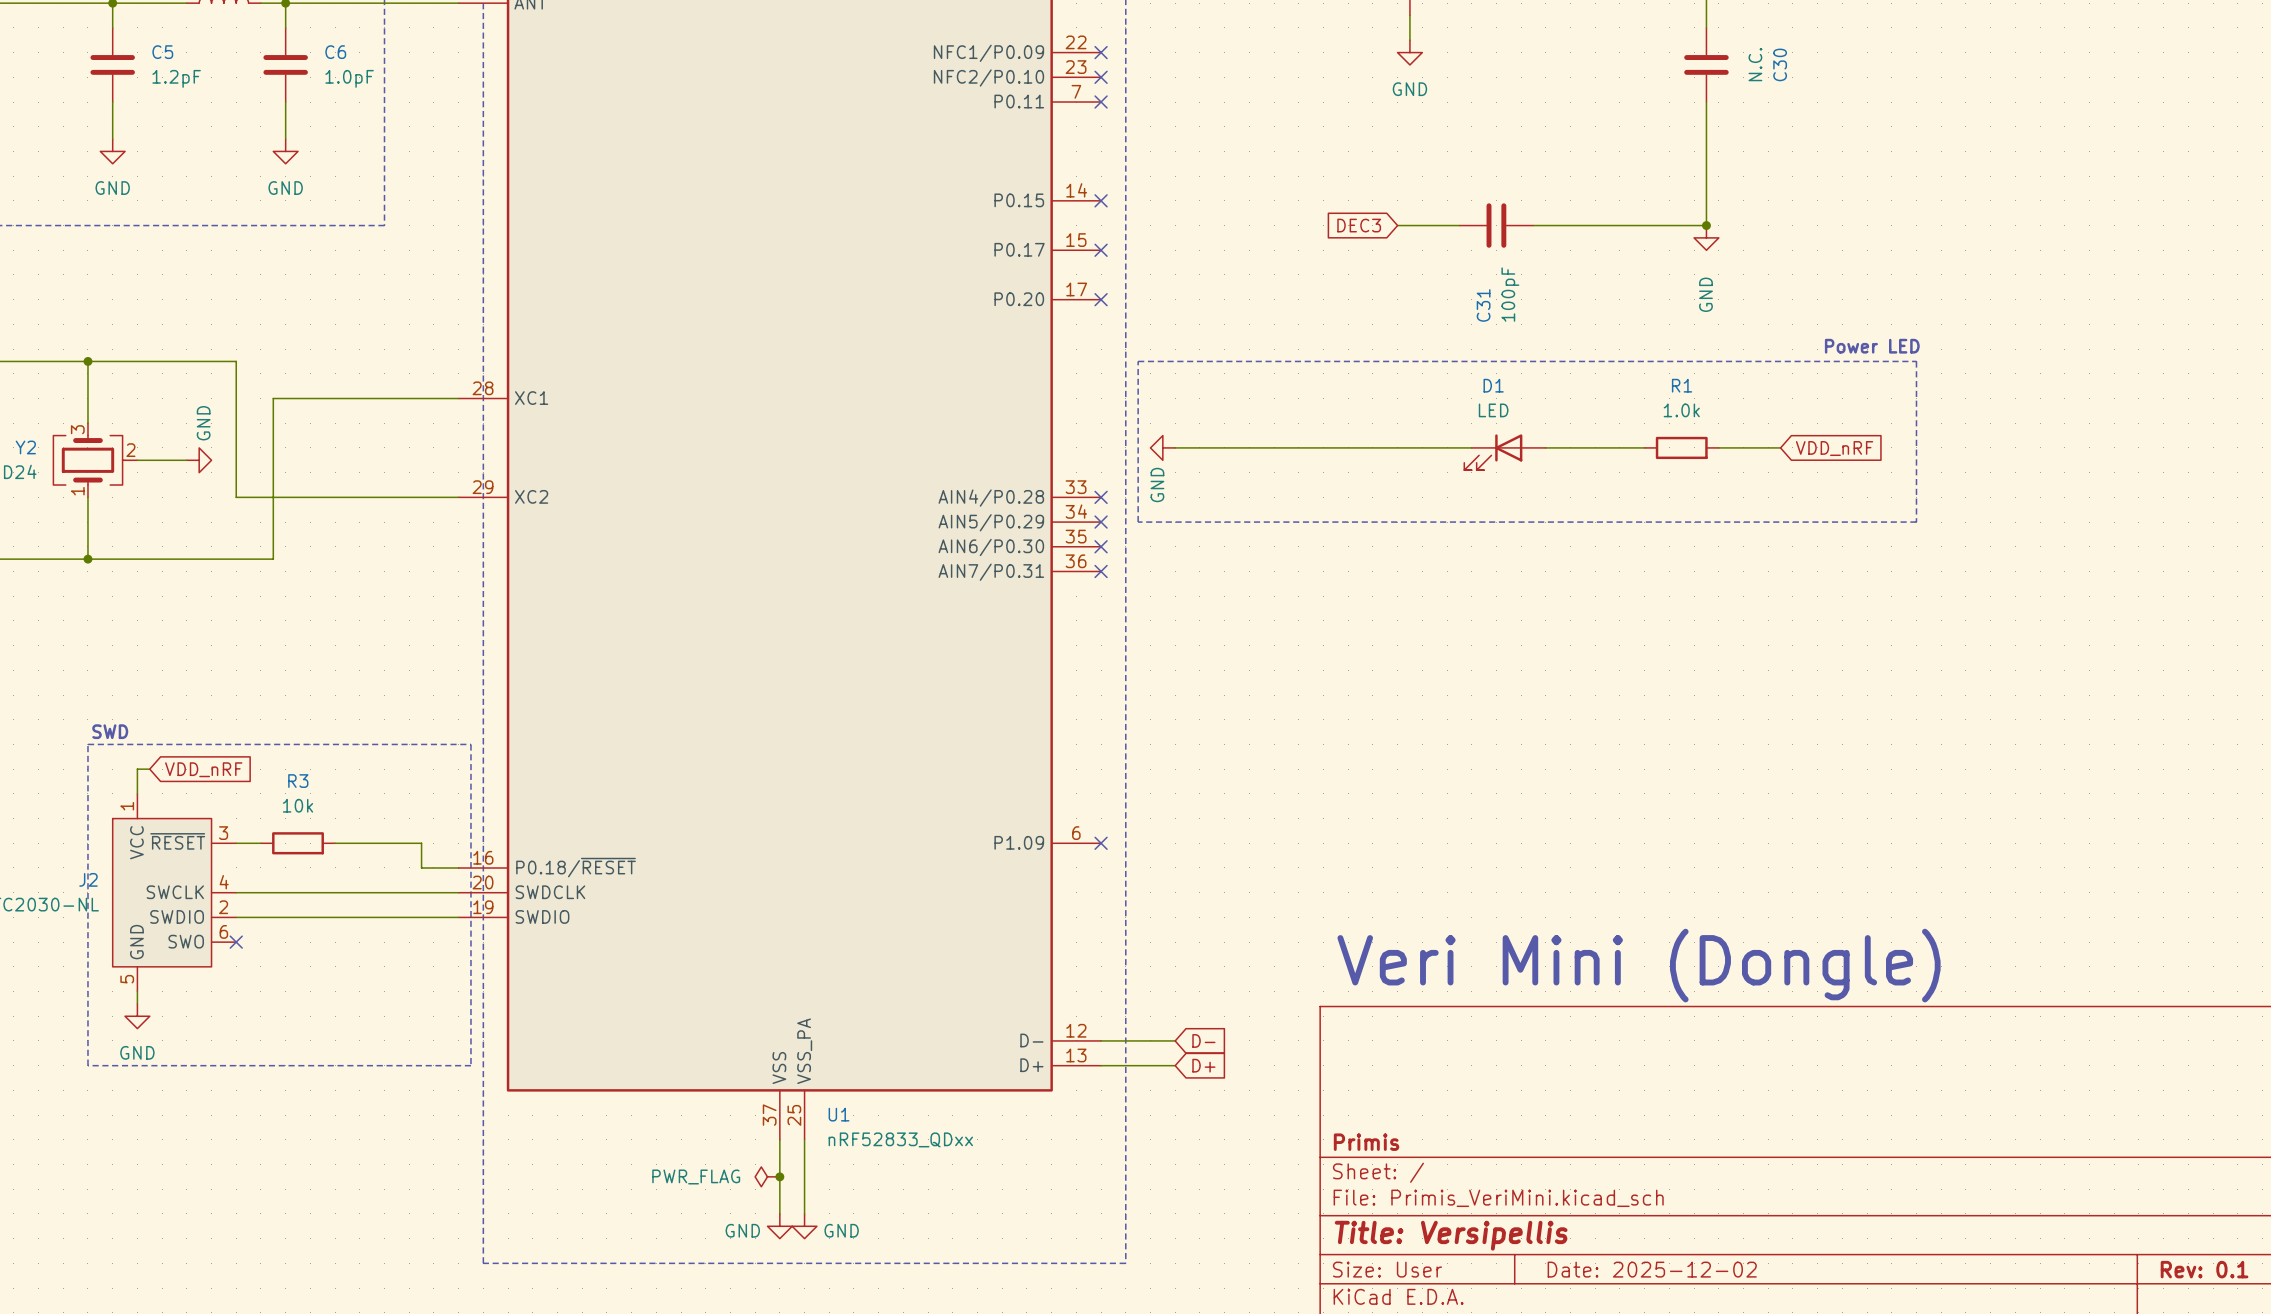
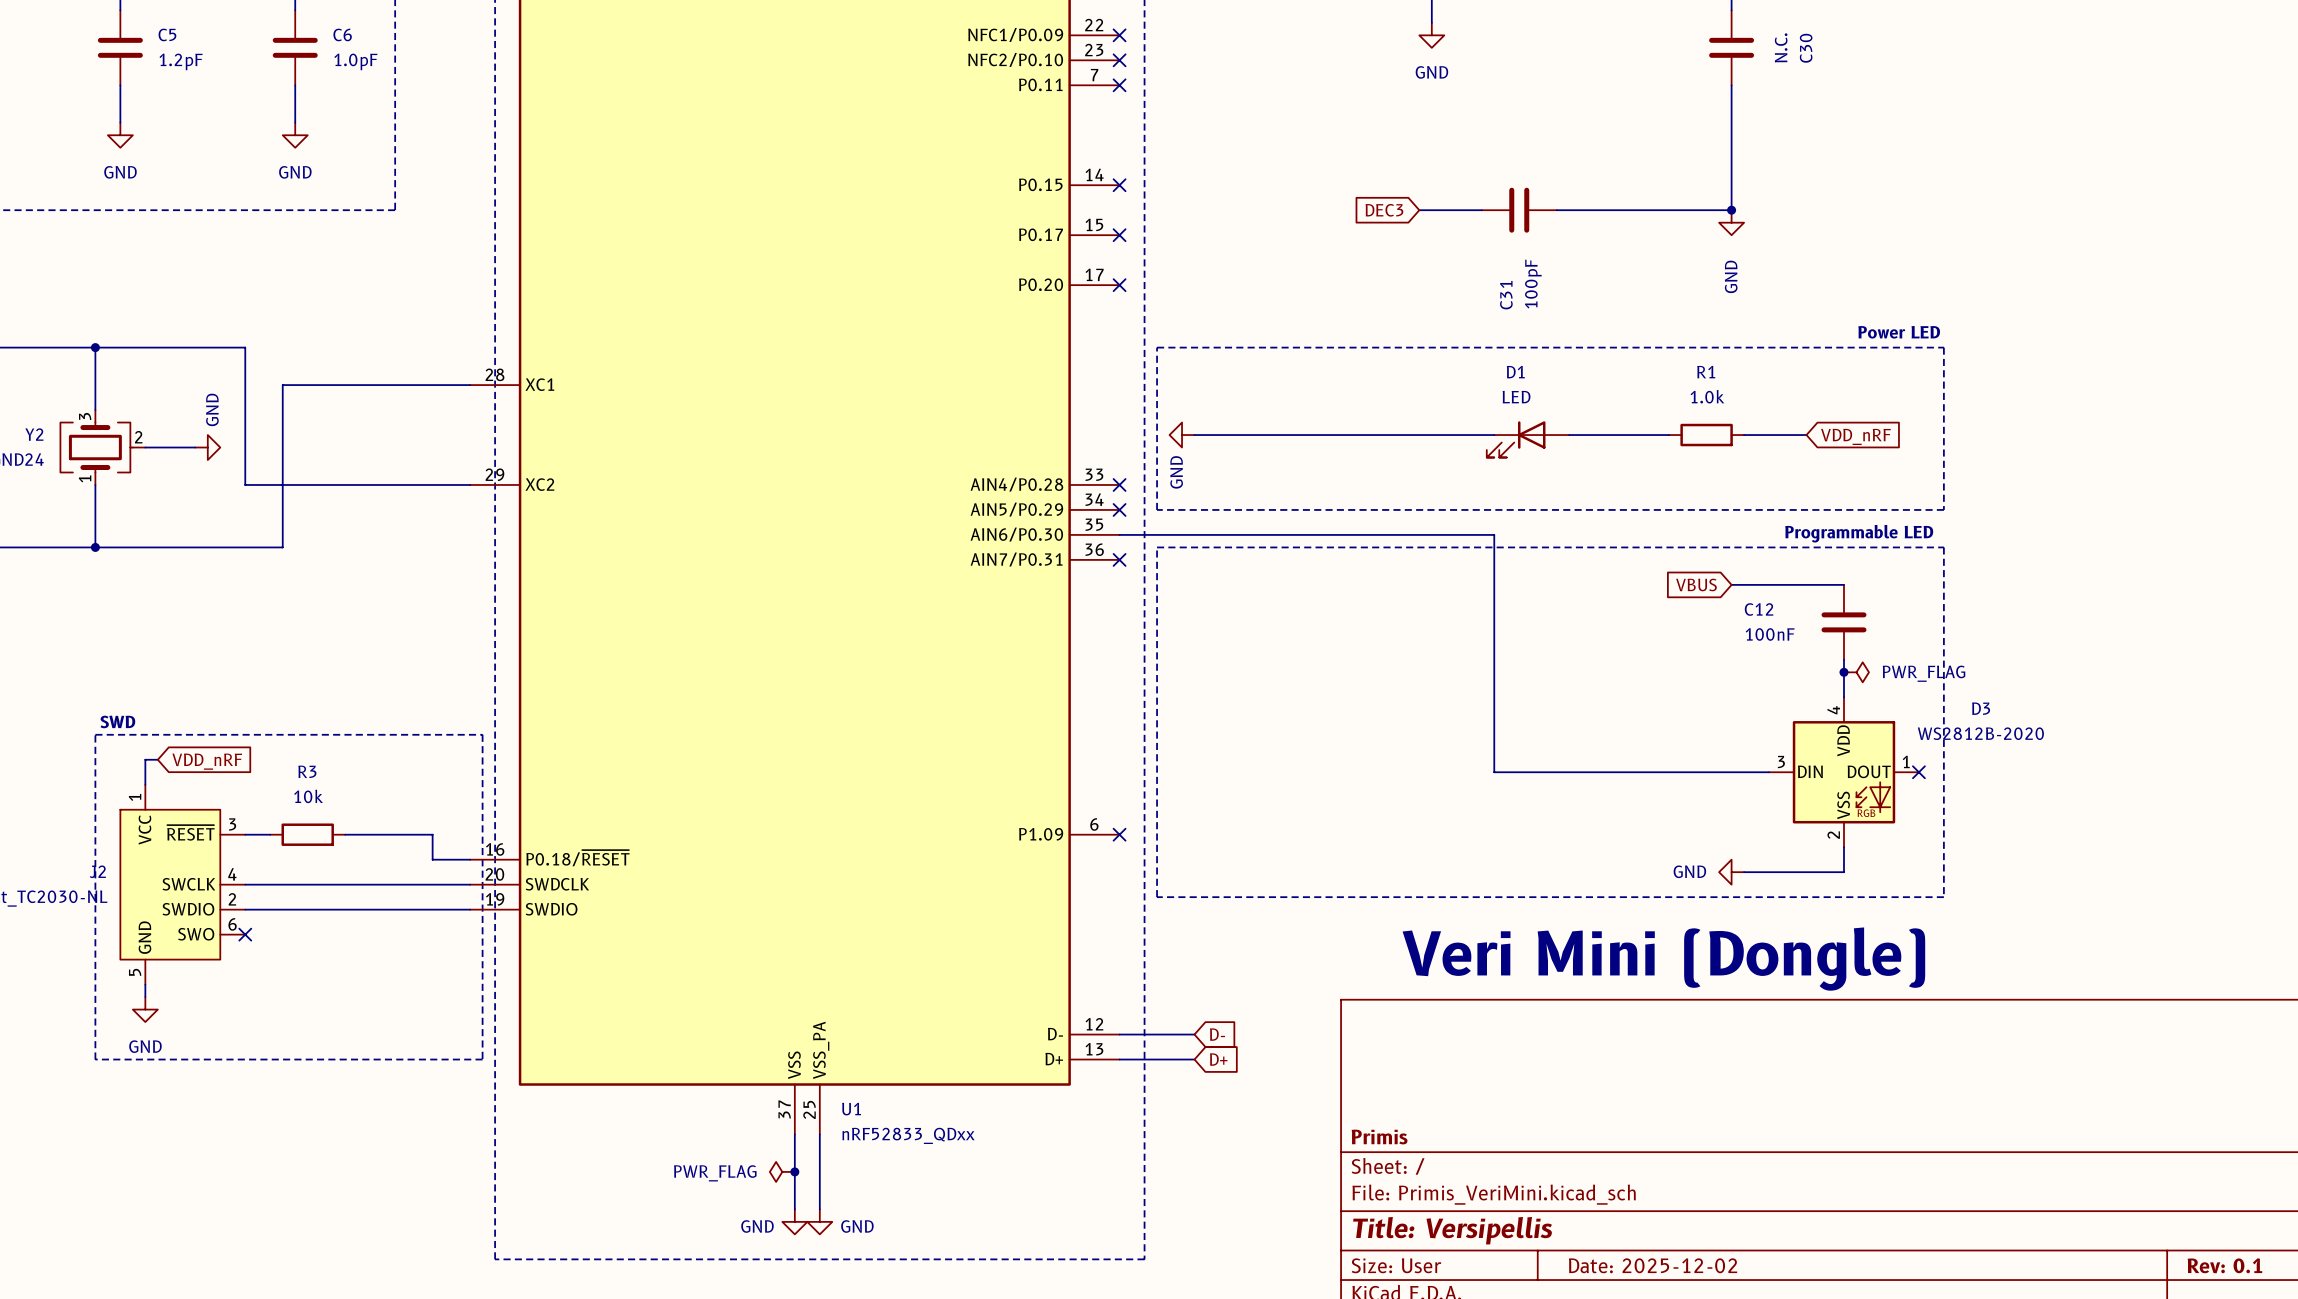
text: none -> Programmable LED (1859, 533)
wire: none -> (1119, 534) (1494, 534) (1494, 772) (1769, 772)
no-connect mark: (1101, 546) -> none
line: none -> (1157, 547) (1943, 547) (1943, 897) (1157, 897) (1157, 547)
global label: none -> VBUS (1696, 584)
wire: none -> (1731, 584) (1843, 584)
C12: none -> 100nF (1843, 622)
wire: none -> (1843, 659) (1843, 697)
junction: none -> (1843, 672)
power symbol: none -> PWR_FLAG (1856, 672)
D3: none -> WS2812B-2020 (1843, 772)
no-connect mark: none -> (1918, 772)
wire: none -> (1843, 847) (1843, 872) (1744, 872)
power symbol: none -> GND (1731, 872)

